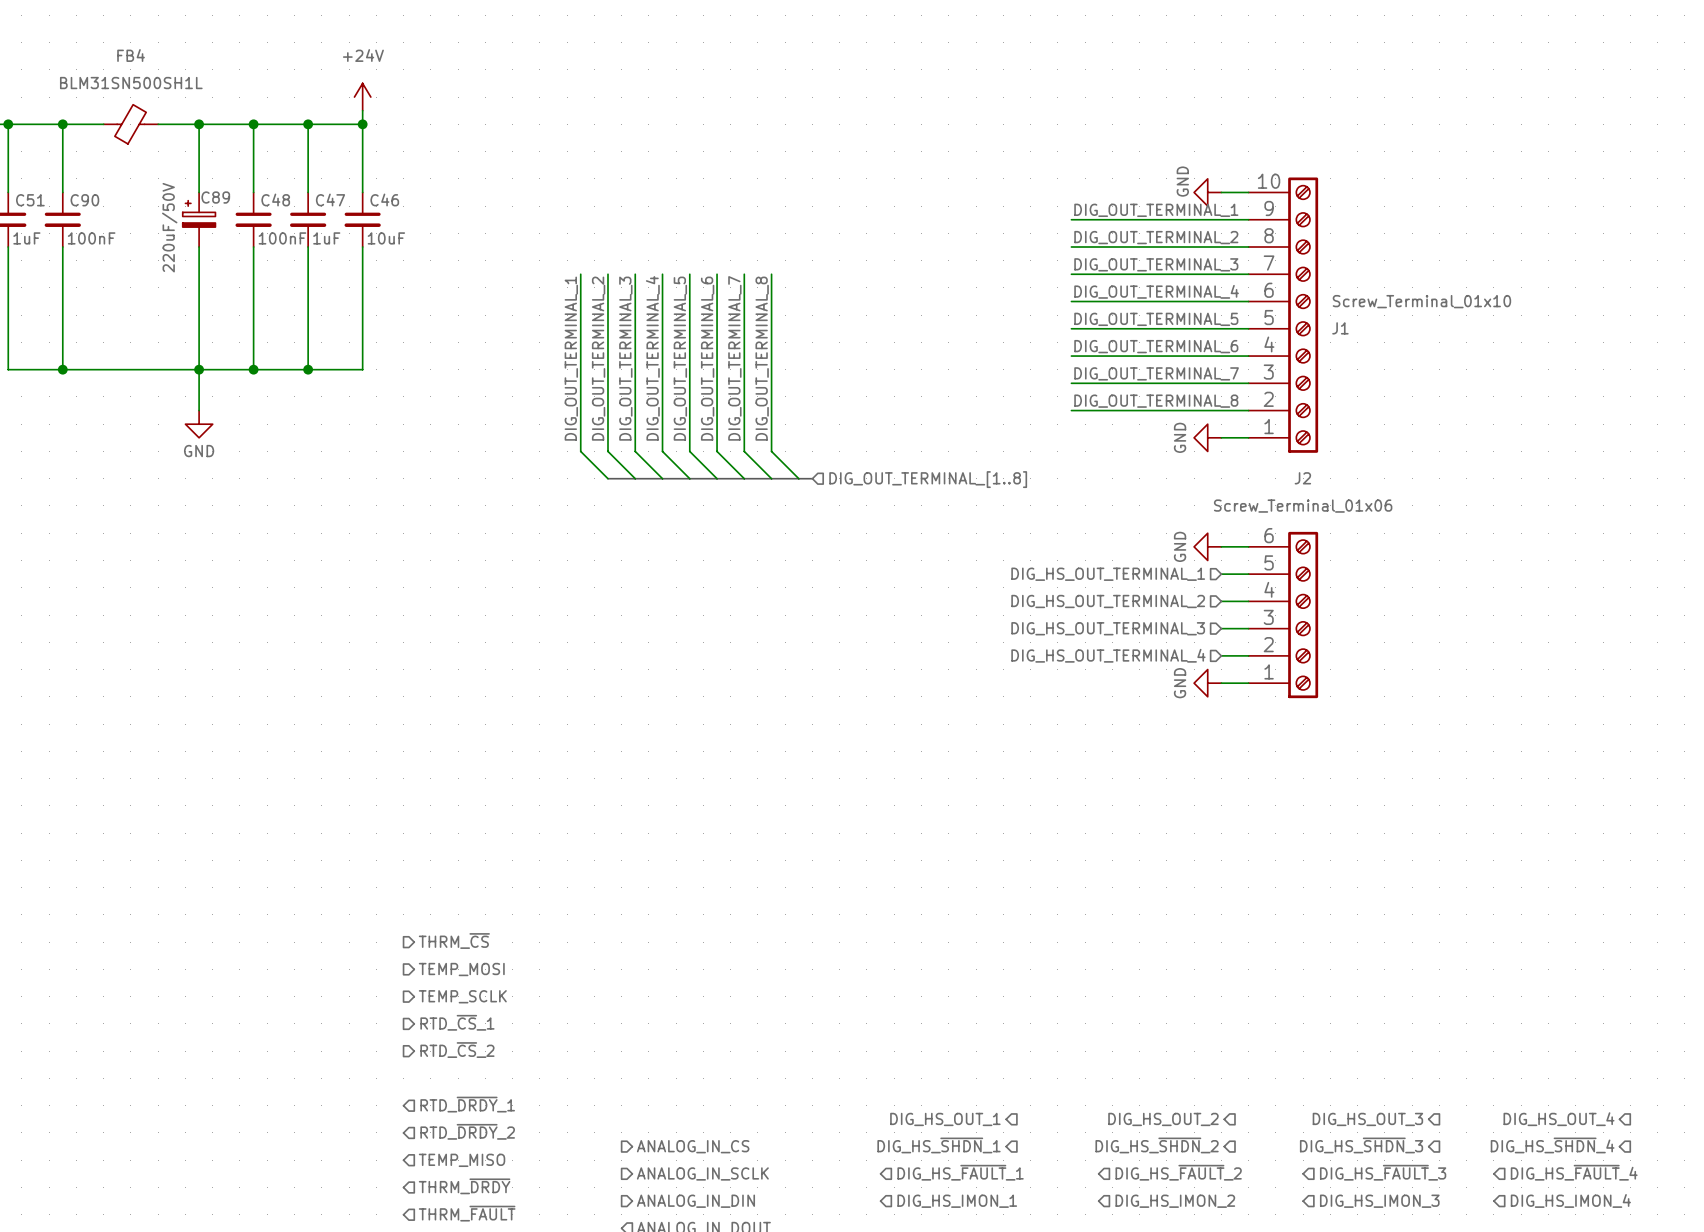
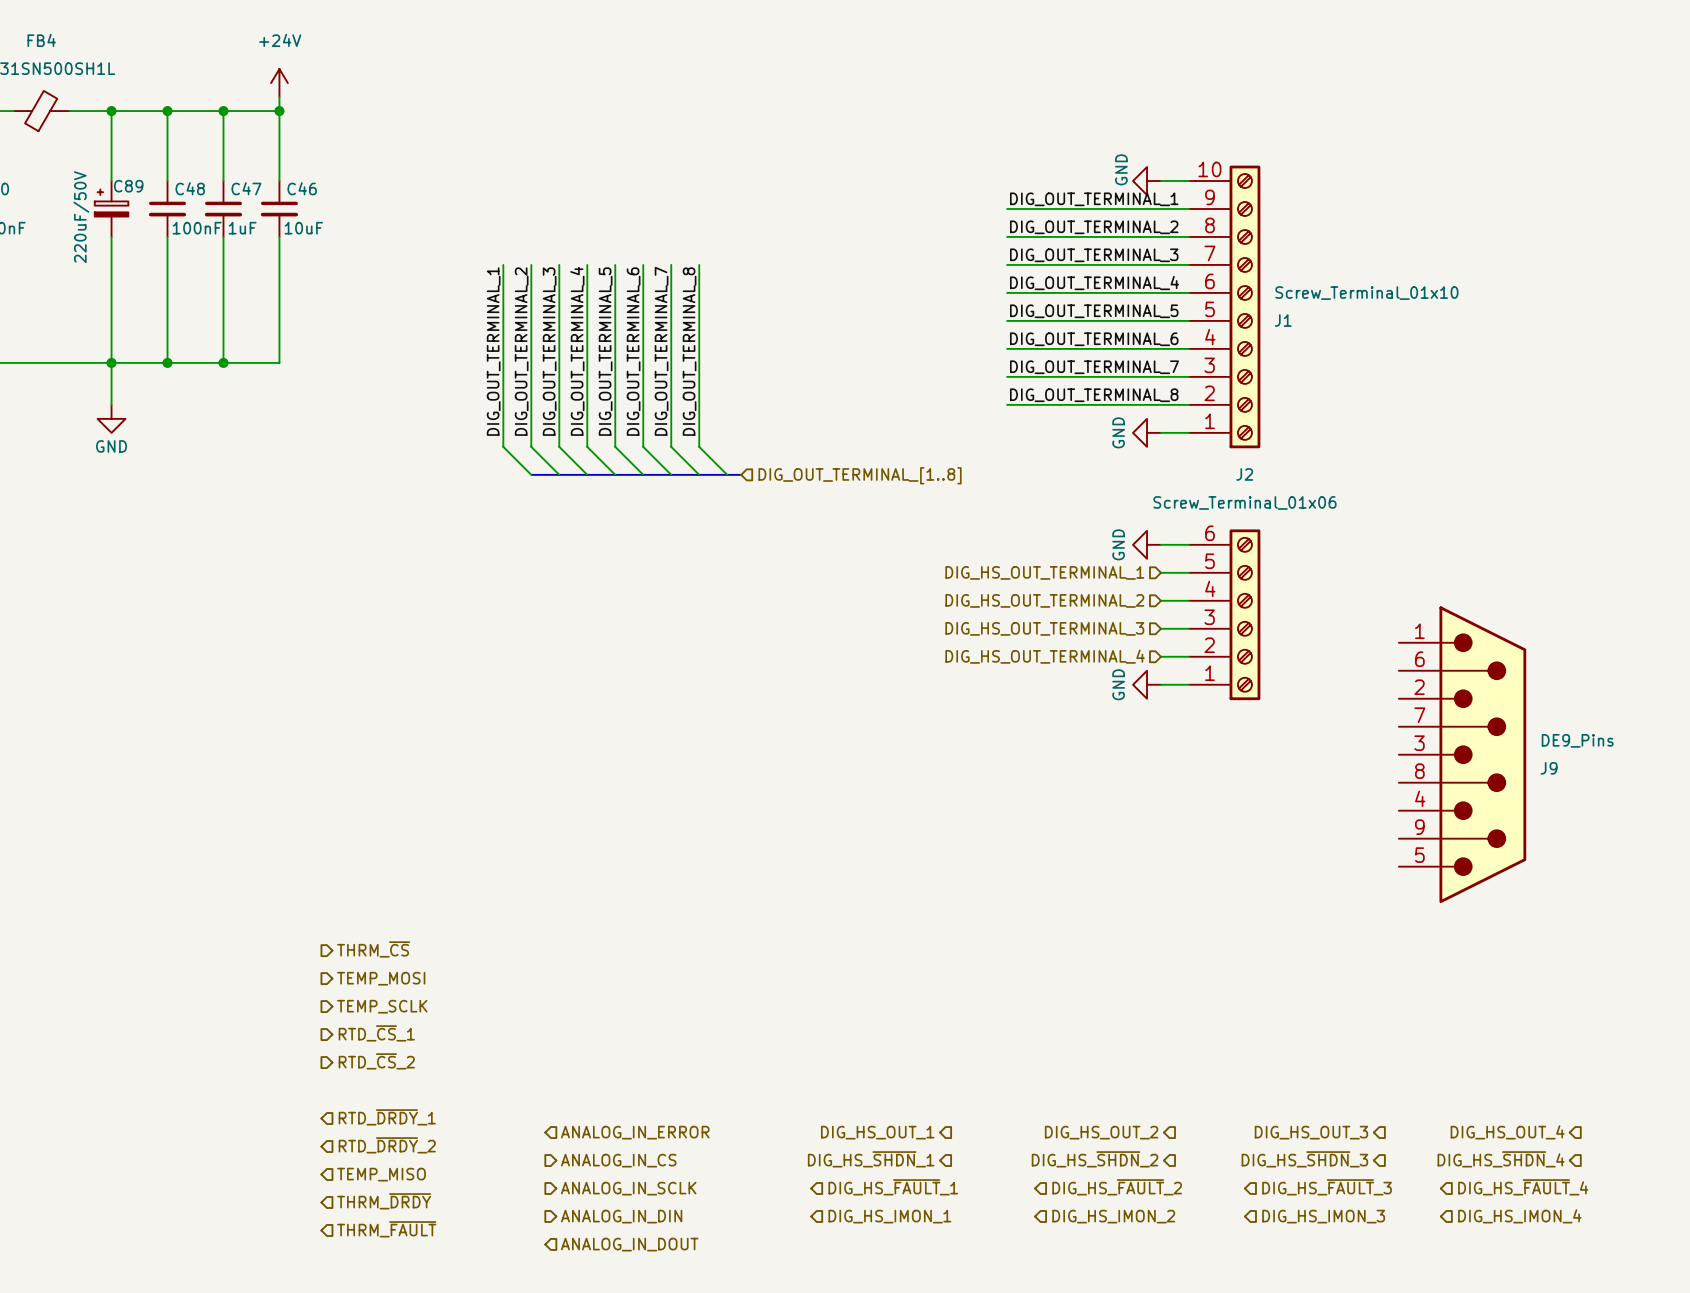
J9: none -> DE9_Pins (1462, 754)
hierarchical label: none -> ANALOG_IN_ERROR (635, 1132)

